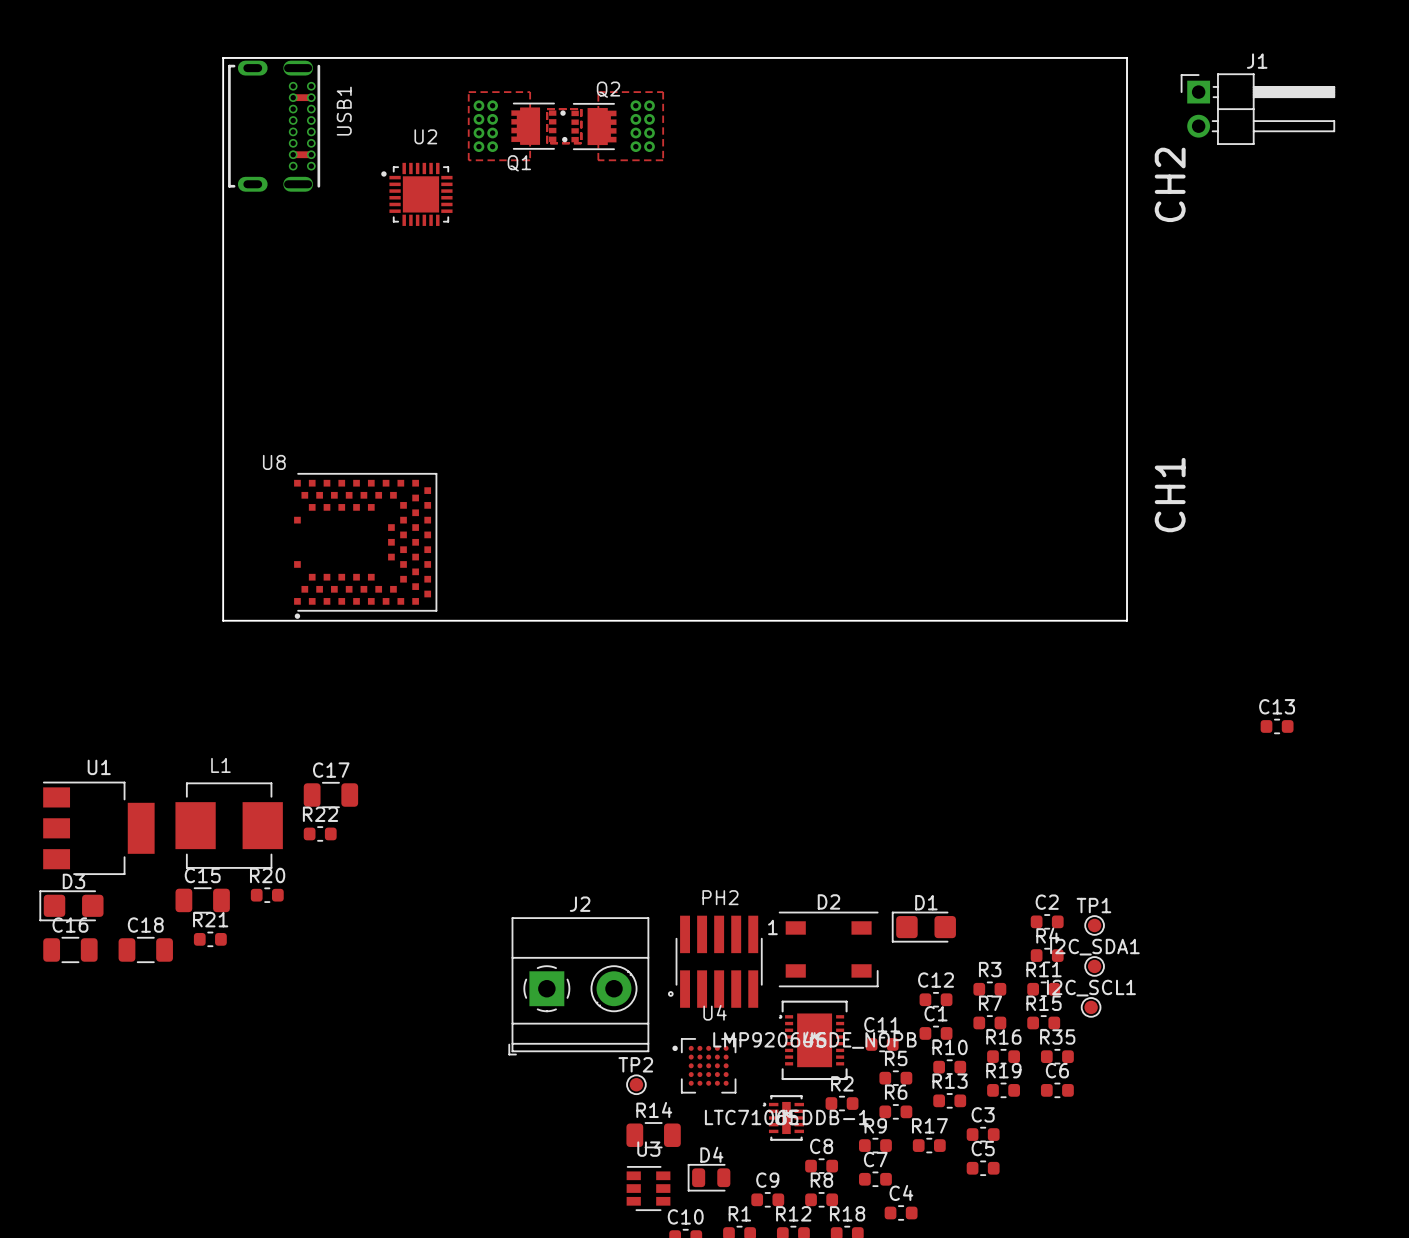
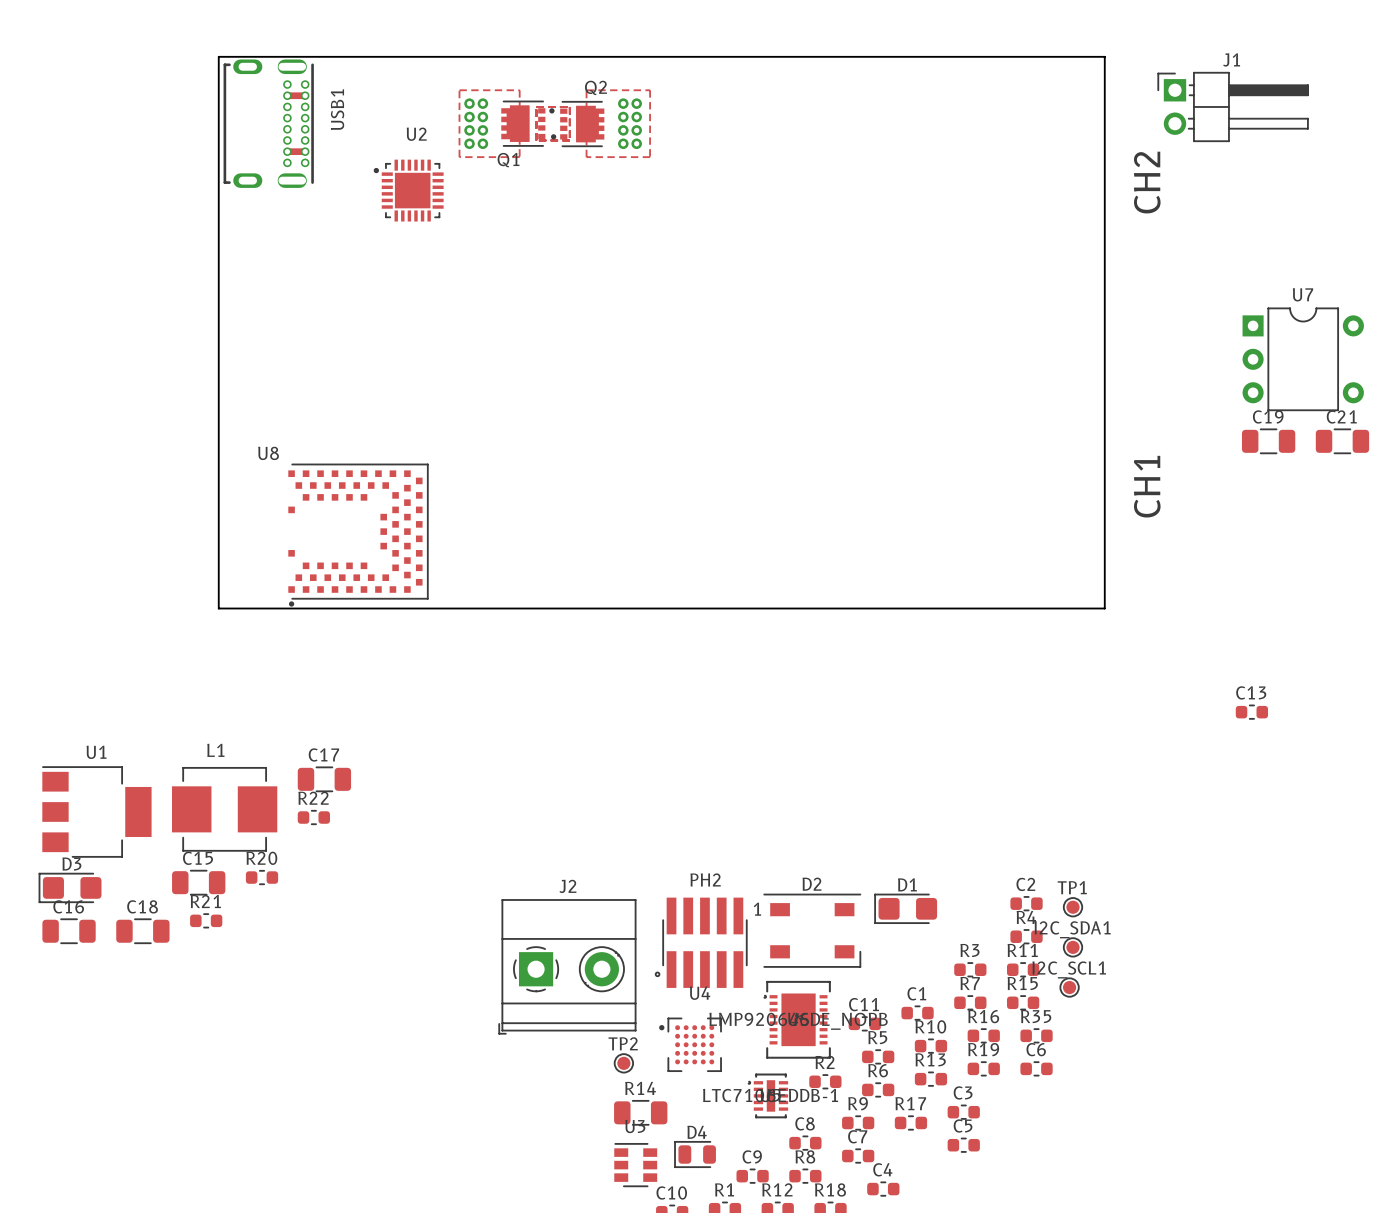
U7: none -> (1303, 359)
C19: none -> (1268, 441)
C21: none -> (1342, 441)
C12: (936, 999) -> none

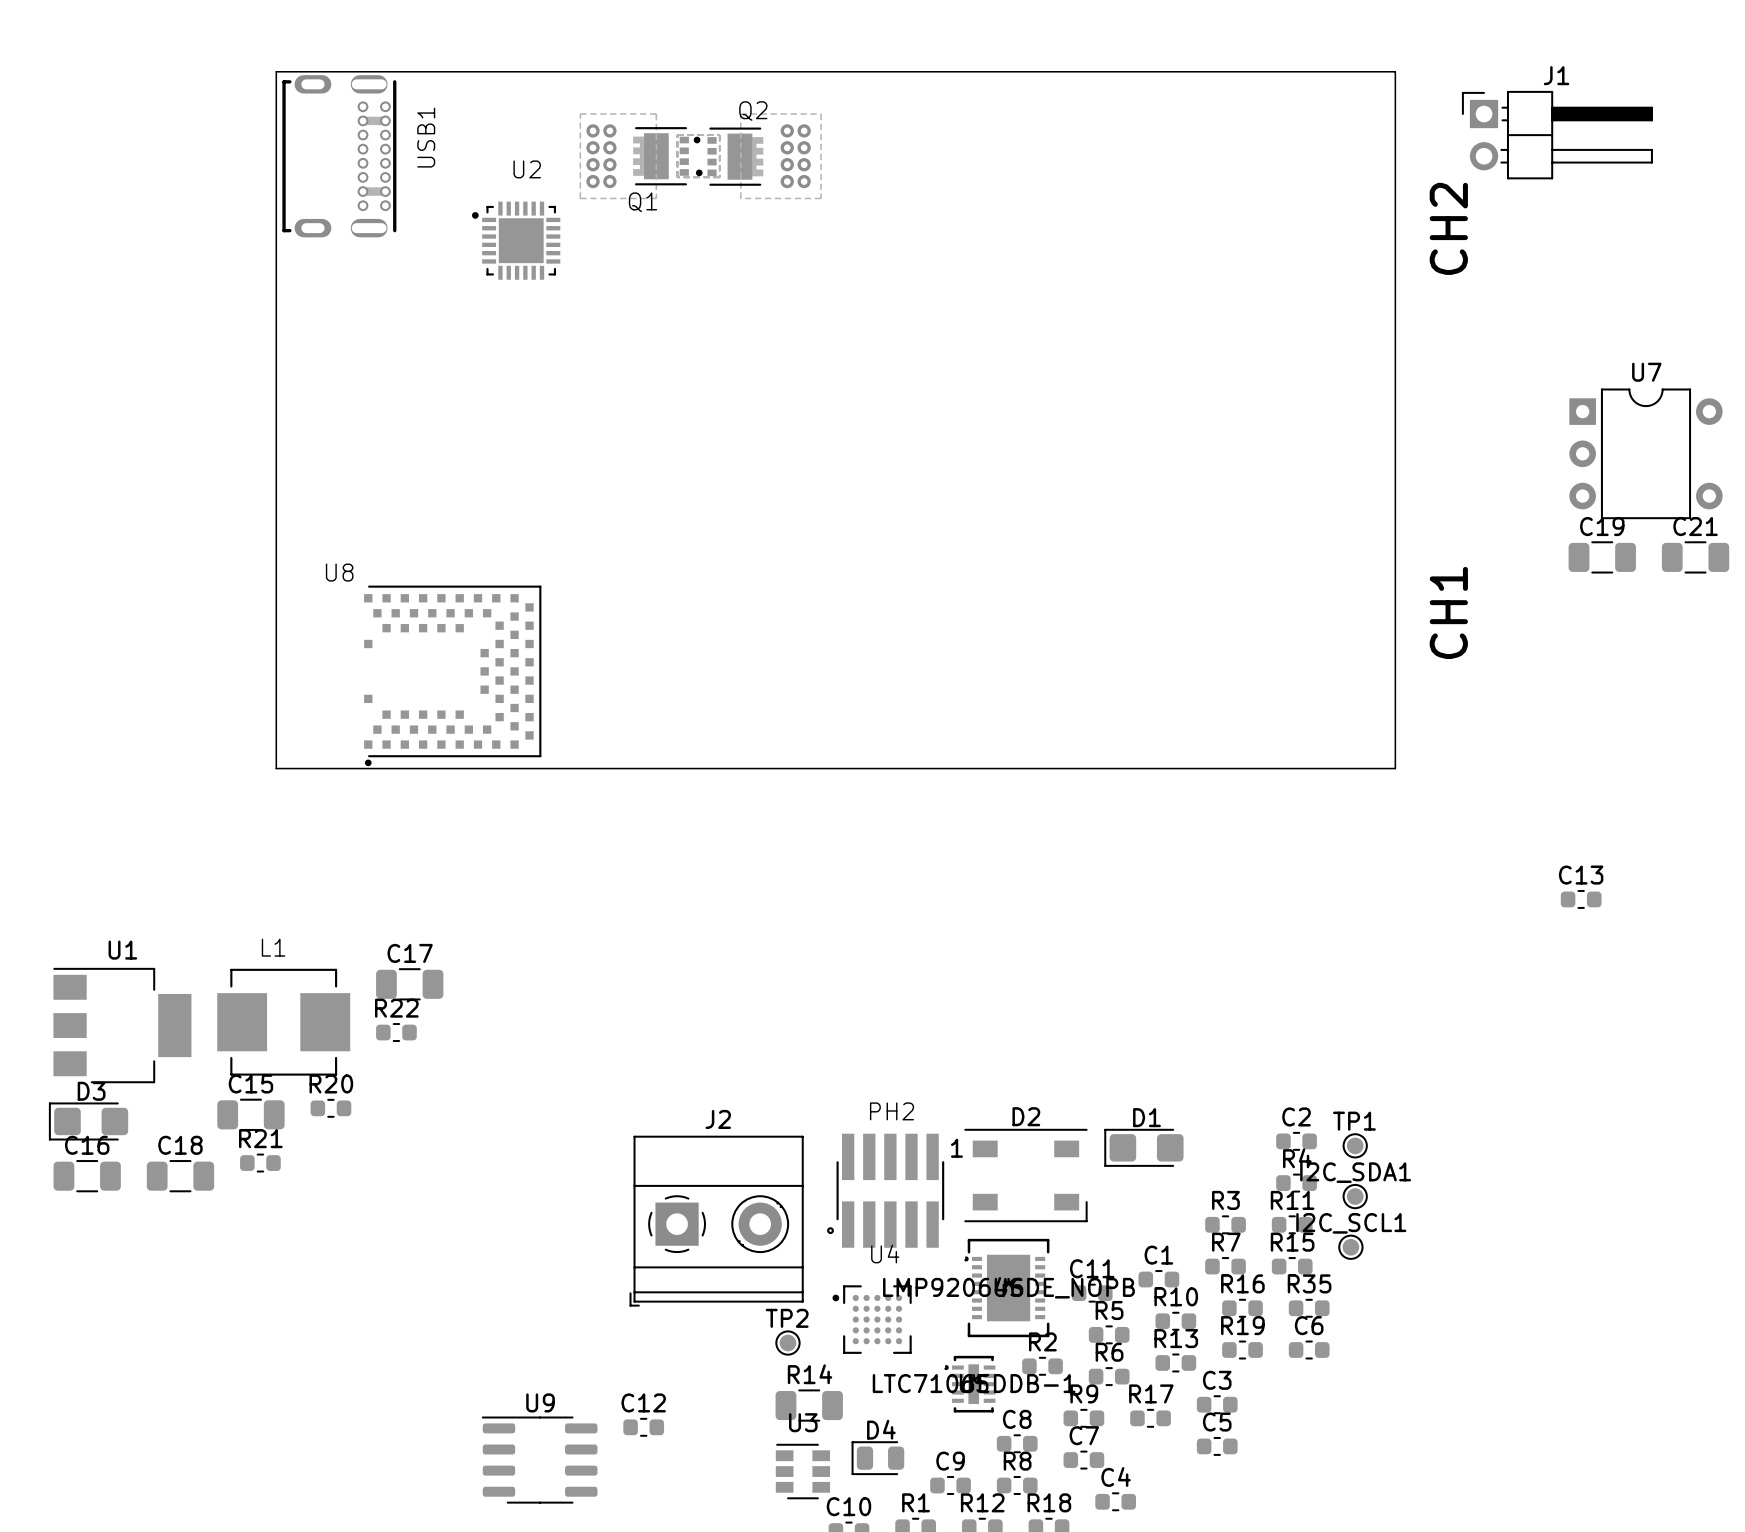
C12: none -> (643, 1427)
U9: none -> (539, 1460)

